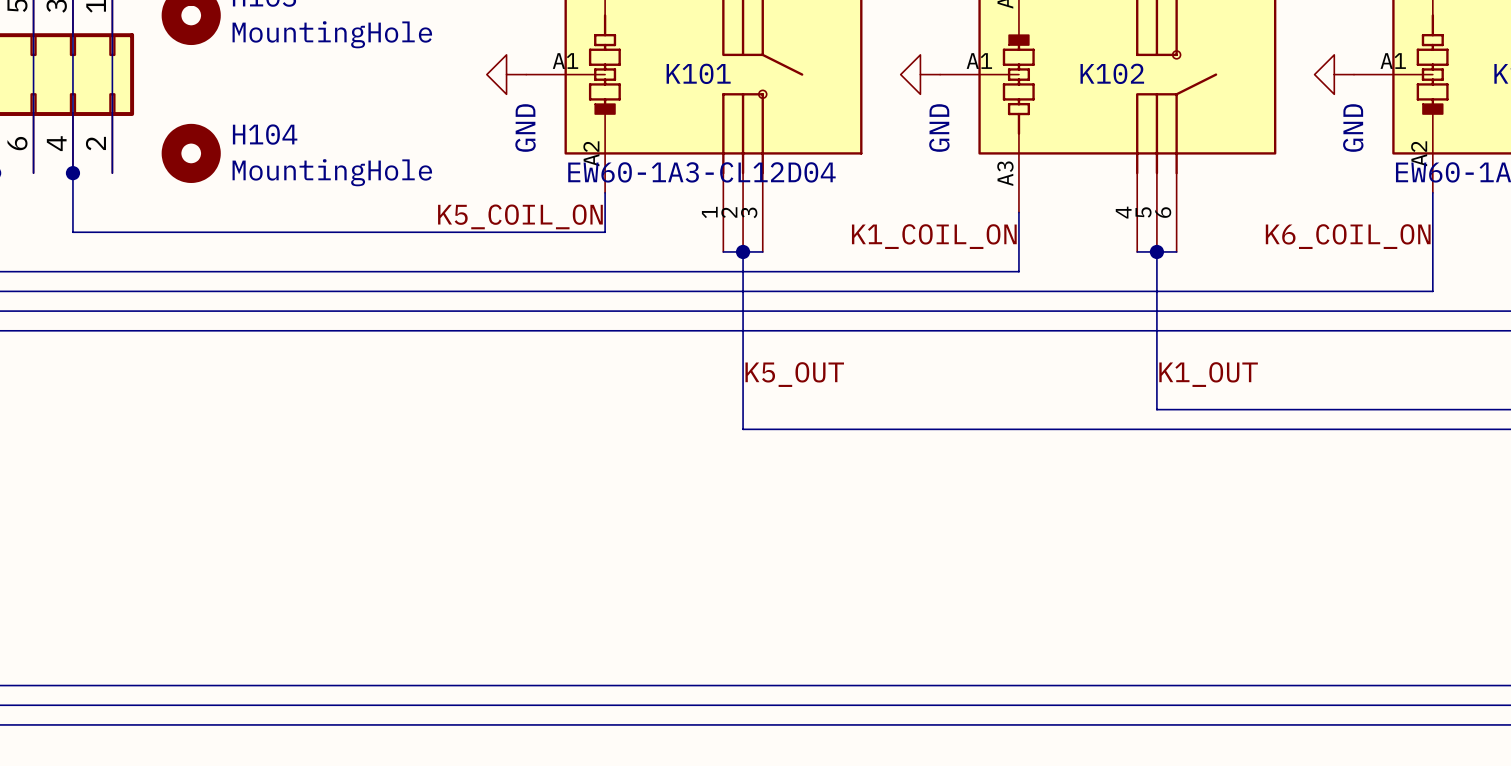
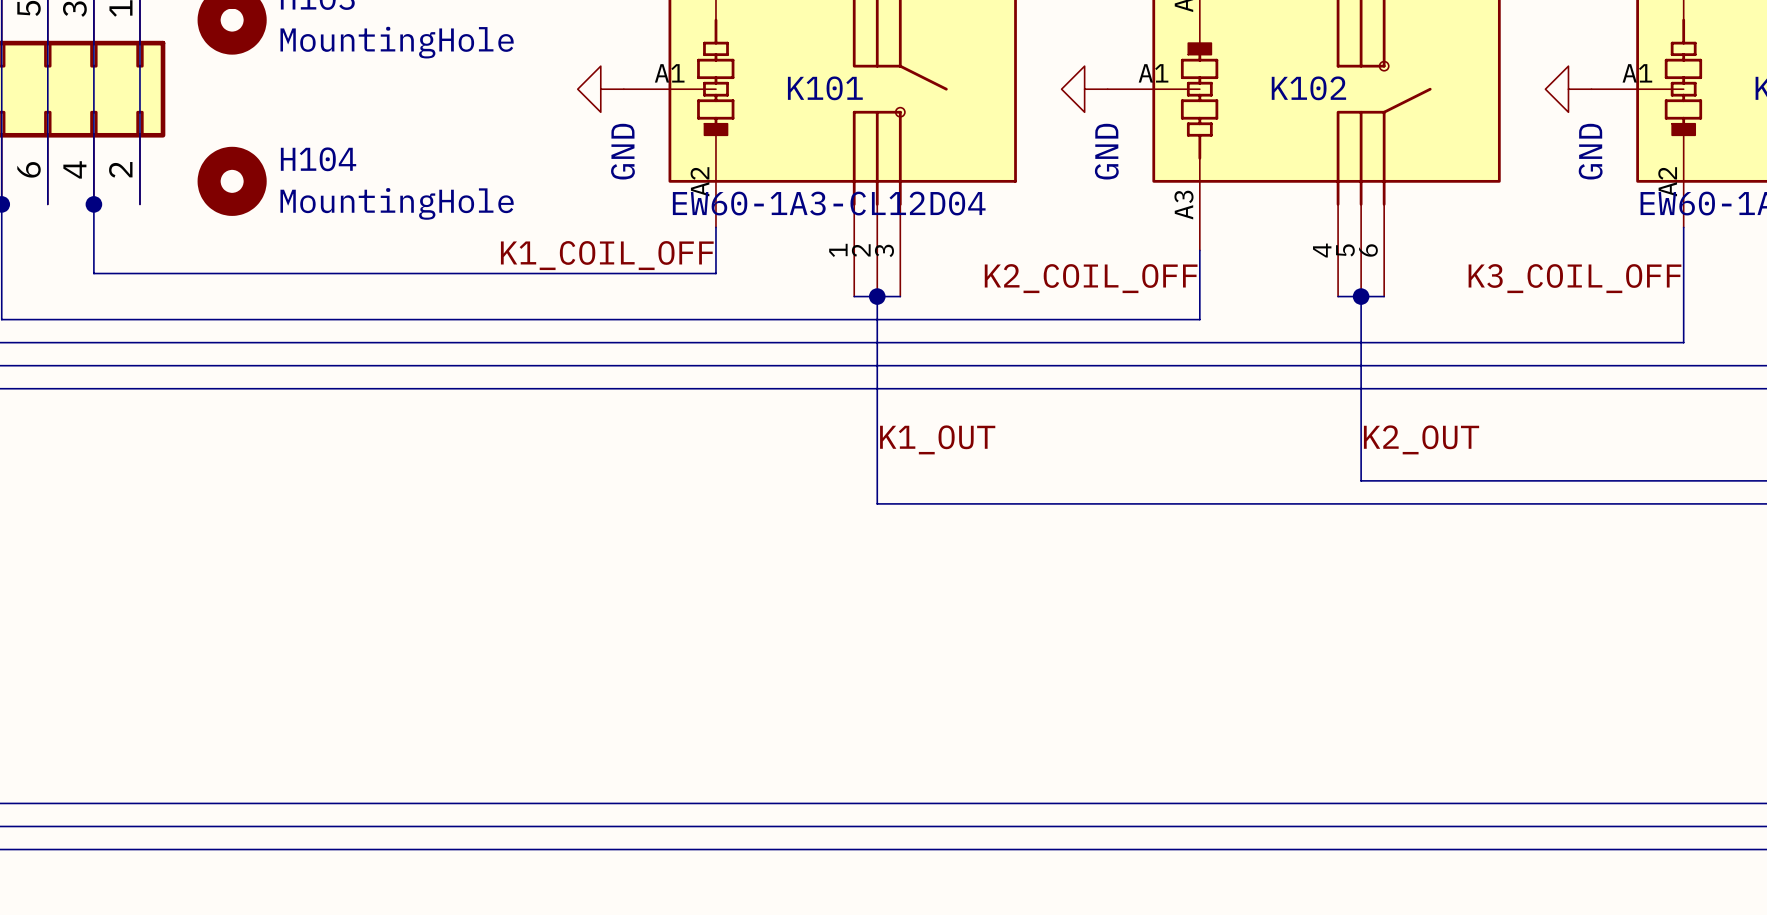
label: K5_COIL_ON (520, 216) -> K1_COIL_OFF (607, 255)
label: K1_COIL_ON (934, 236) -> K2_COIL_OFF (1091, 278)
label: K6_COIL_ON (1348, 236) -> K3_COIL_OFF (1574, 278)
label: K5_OUT (794, 374) -> K1_OUT (937, 439)
label: K1_OUT (1208, 374) -> K2_OUT (1421, 439)

